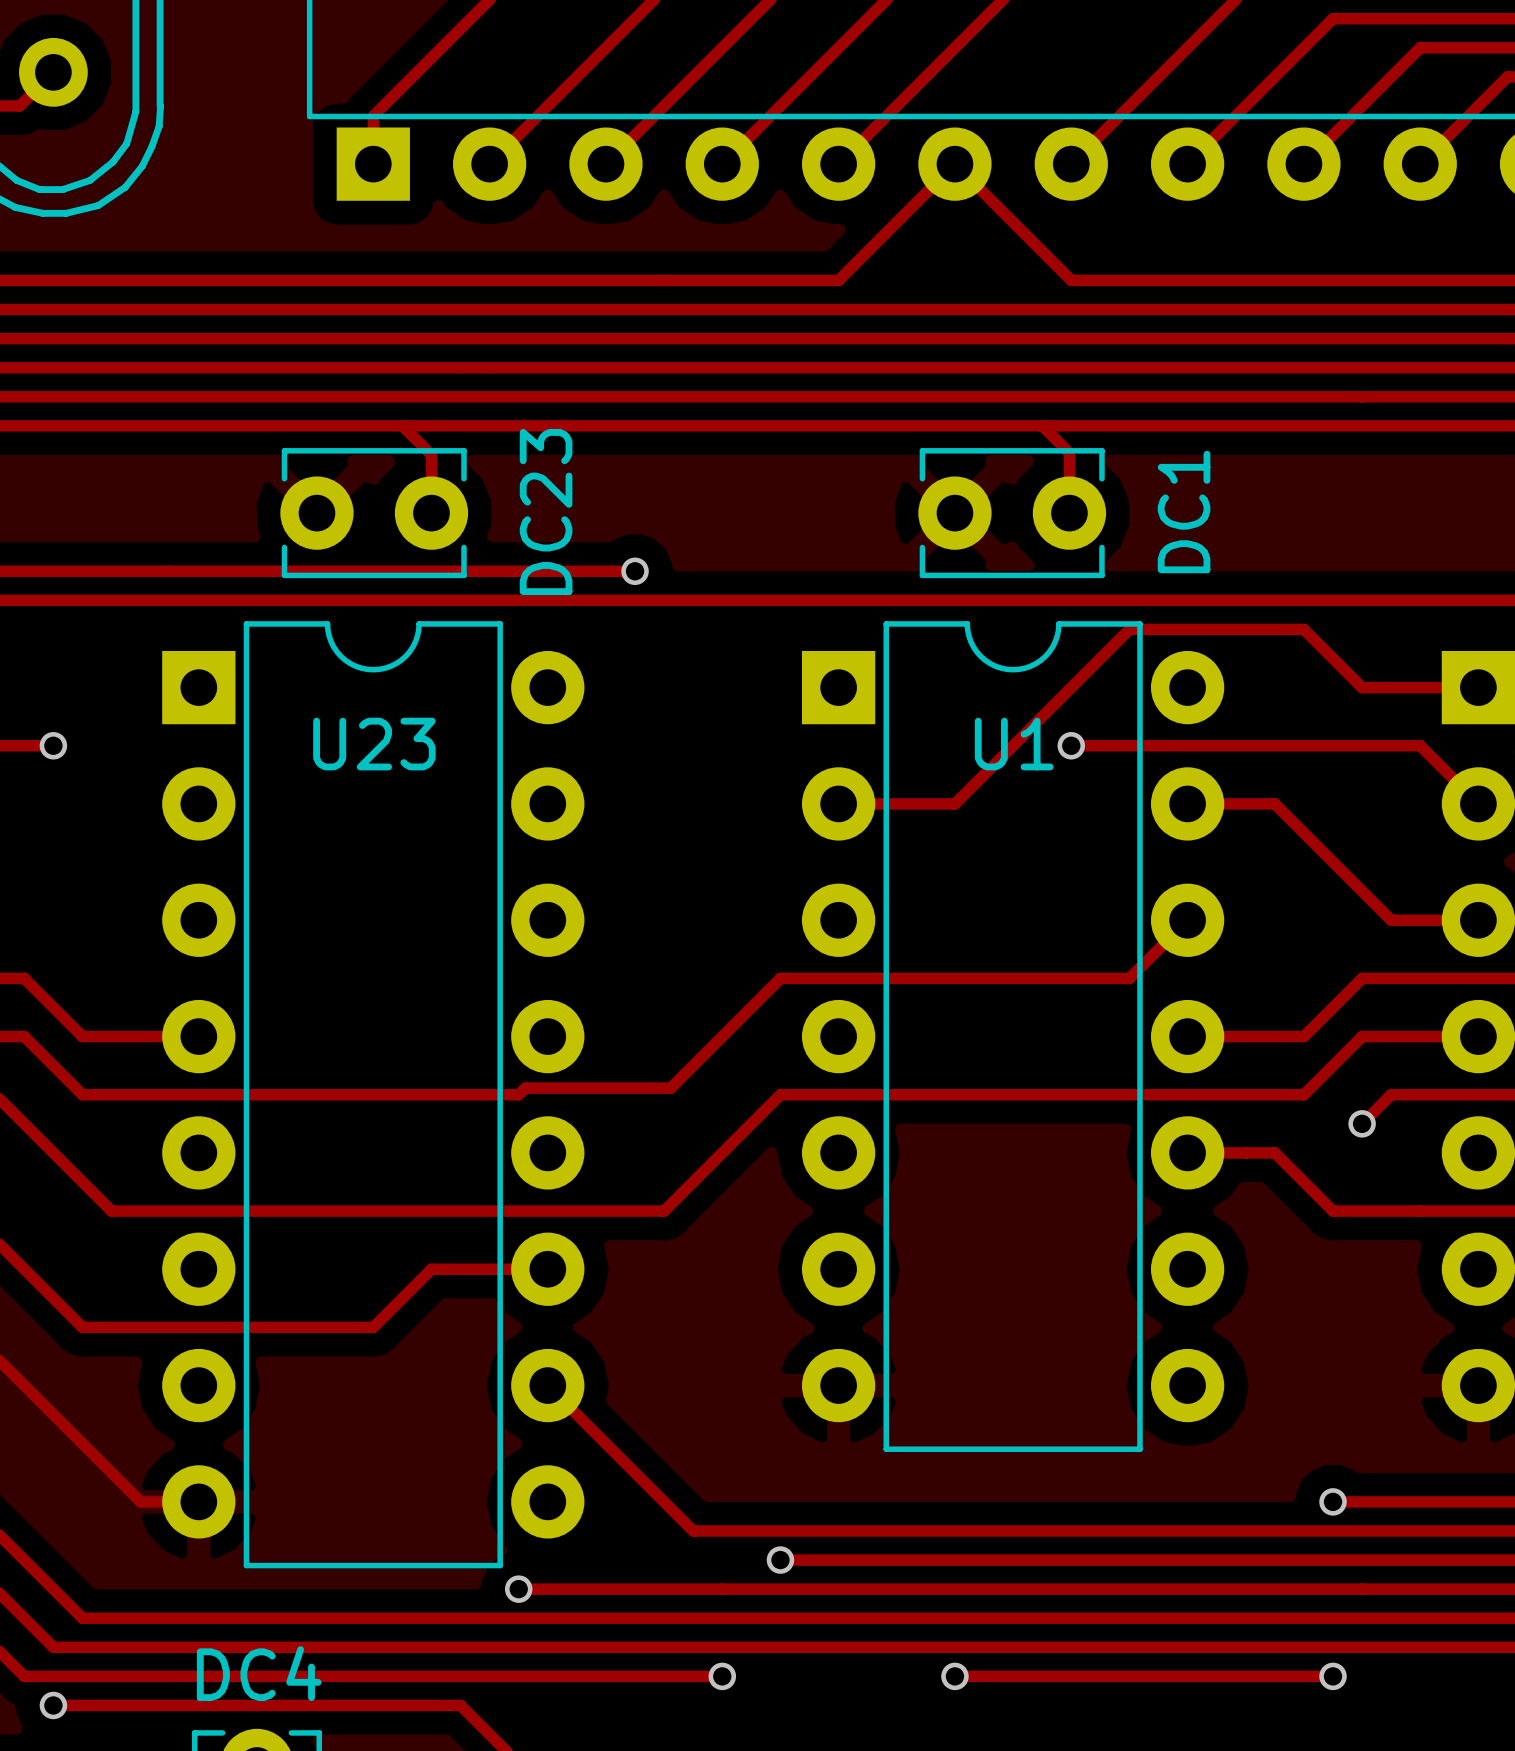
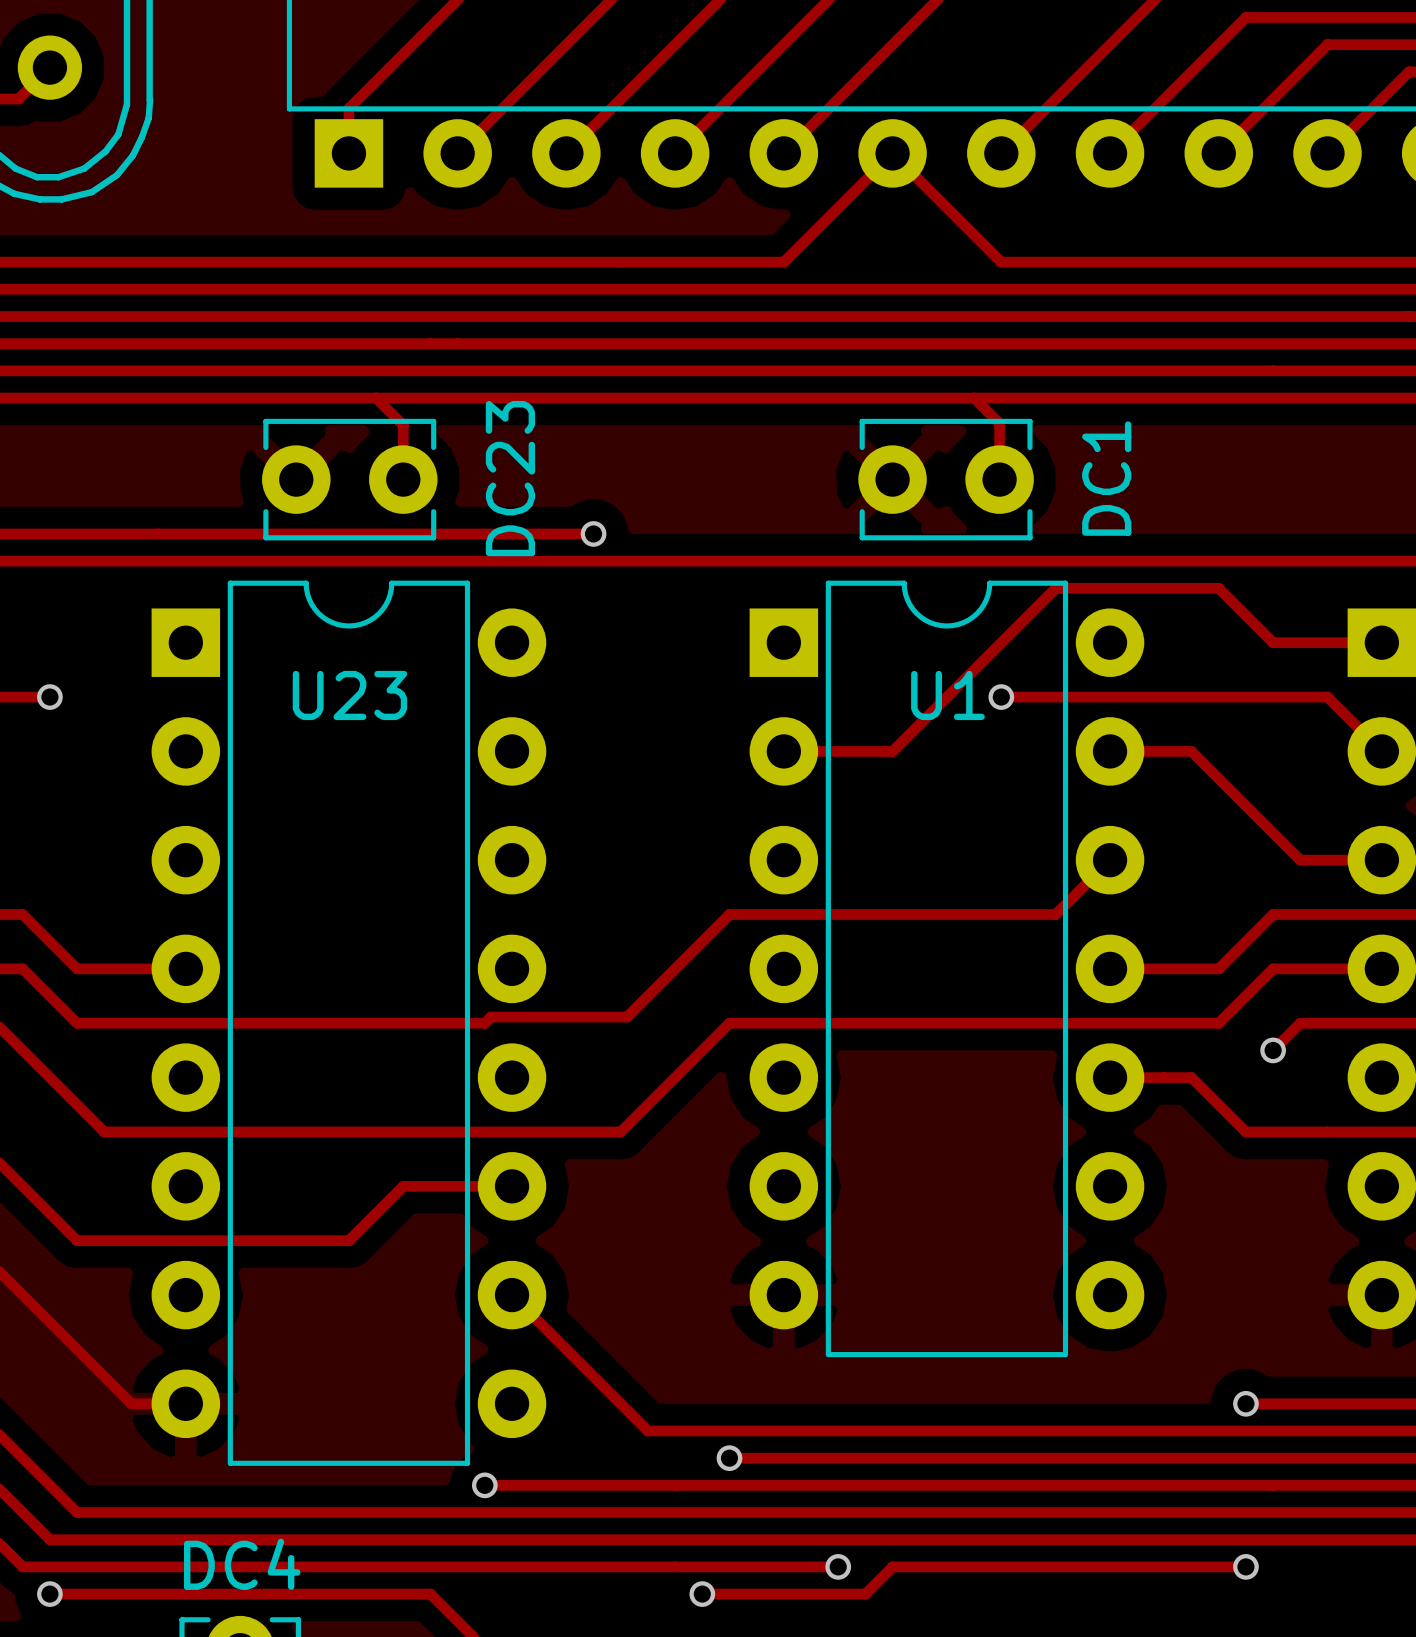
track: none -> (675, 1566) (838, 1566)
via position: (722, 1676) -> (702, 1594)
track: none -> (892, 1566) (865, 1594) (702, 1594)
via position: (954, 1676) -> (838, 1566)

